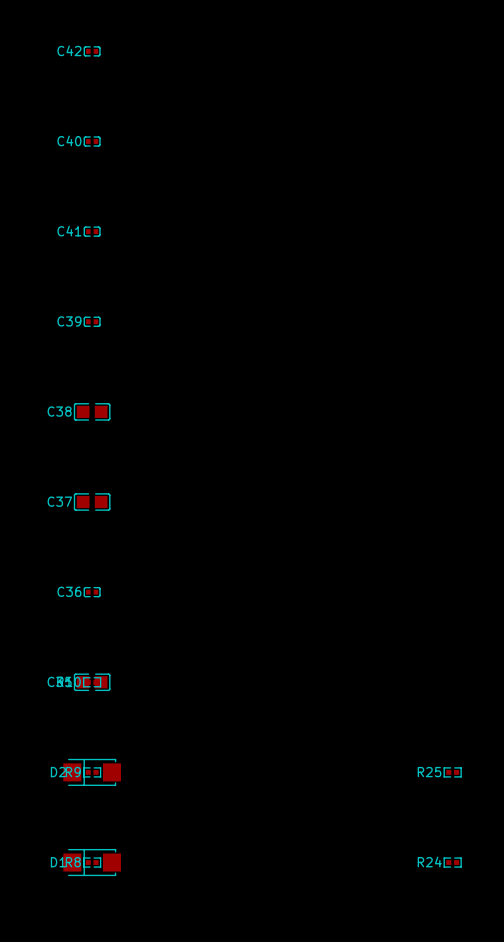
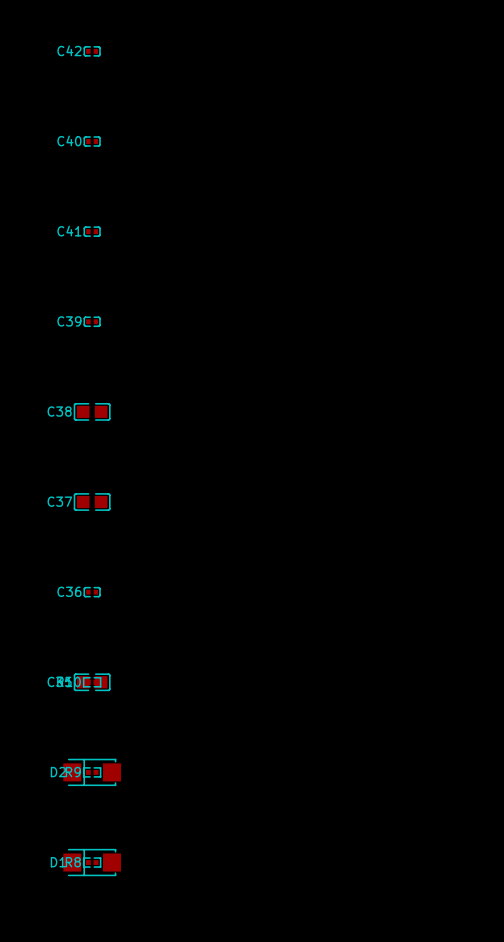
R25: (452, 772) -> none
R24: (452, 862) -> none

